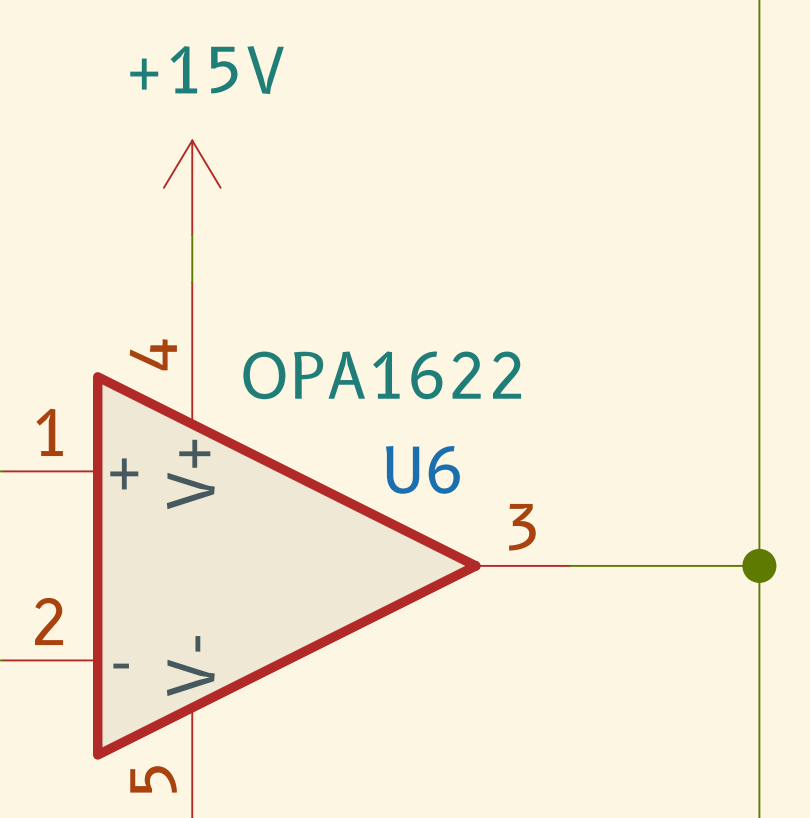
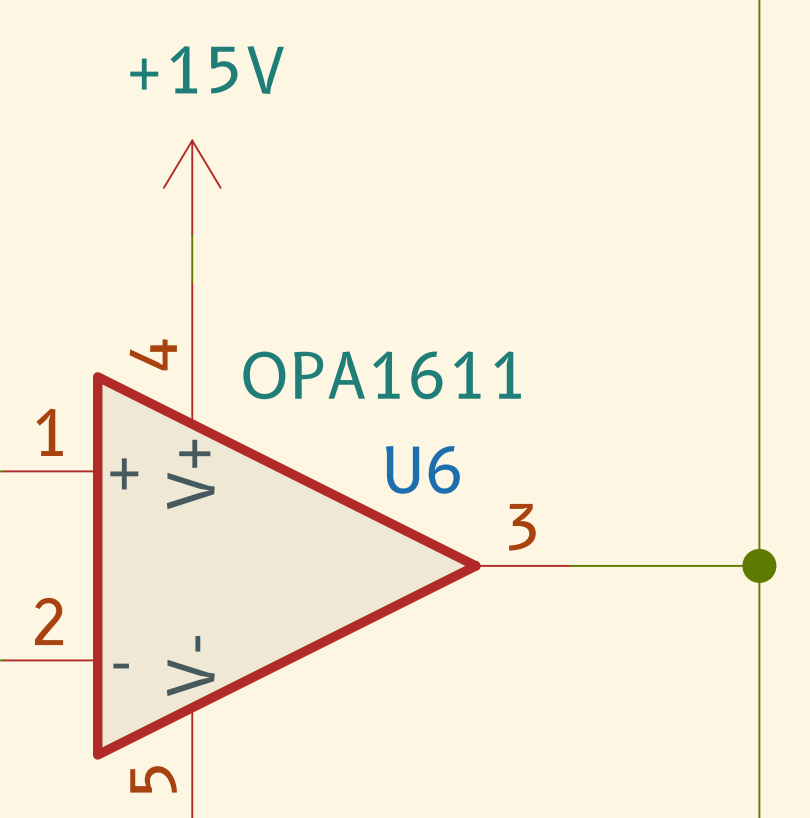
U6 value: OPA1622 (382, 375) -> OPA1611 (382, 375)

